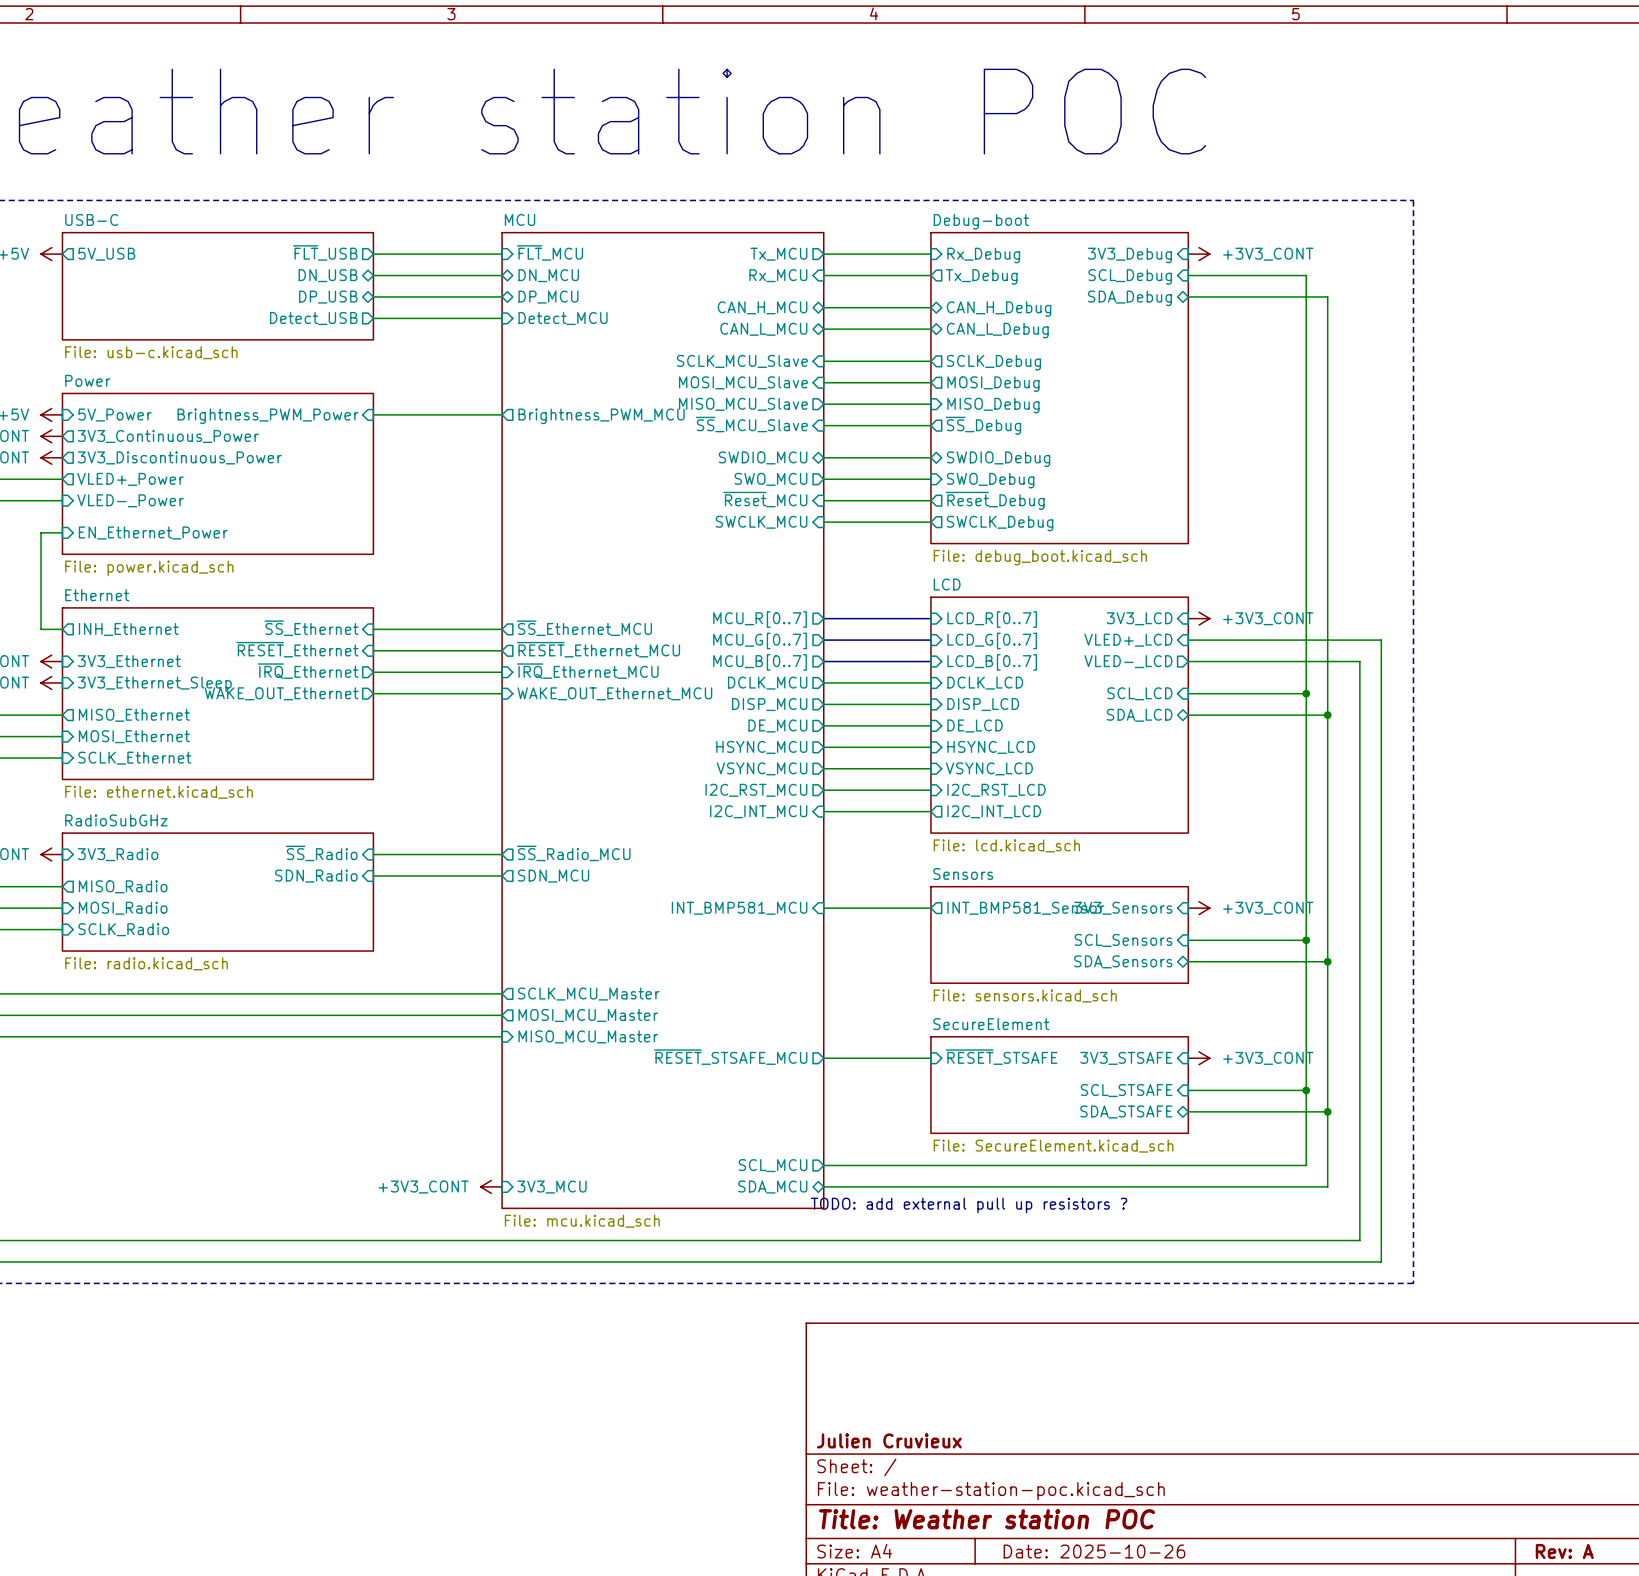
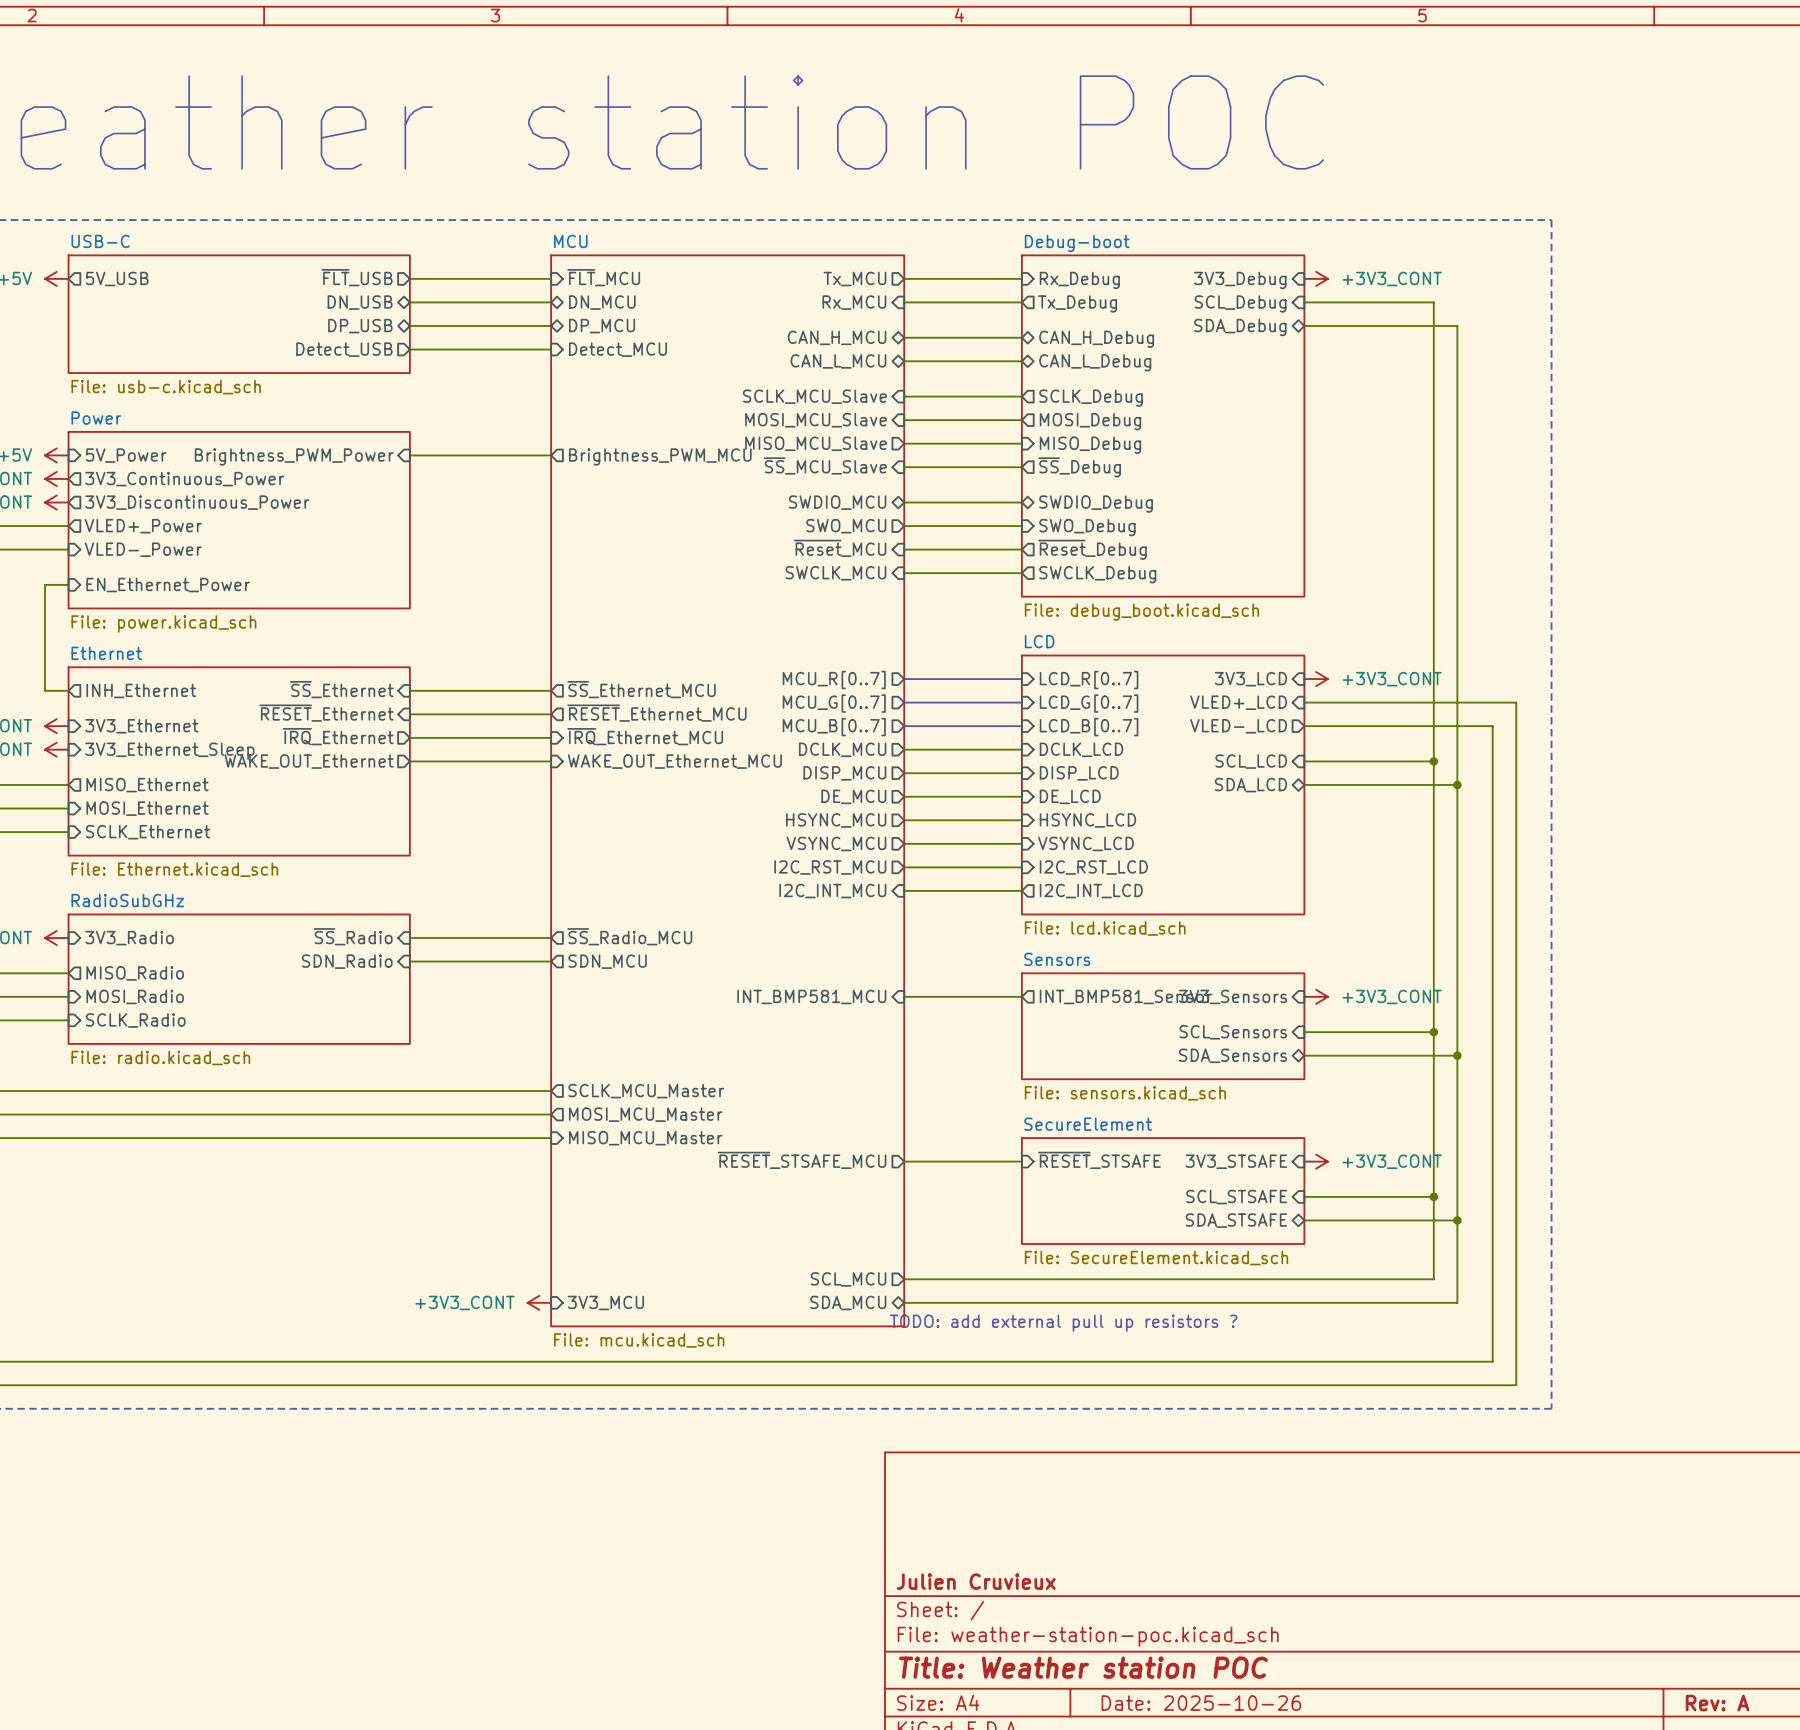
sheet Ethernet value: File: ethernet.kicad_sch (159, 792) -> File: Ethernet.kicad_sch (174, 869)

